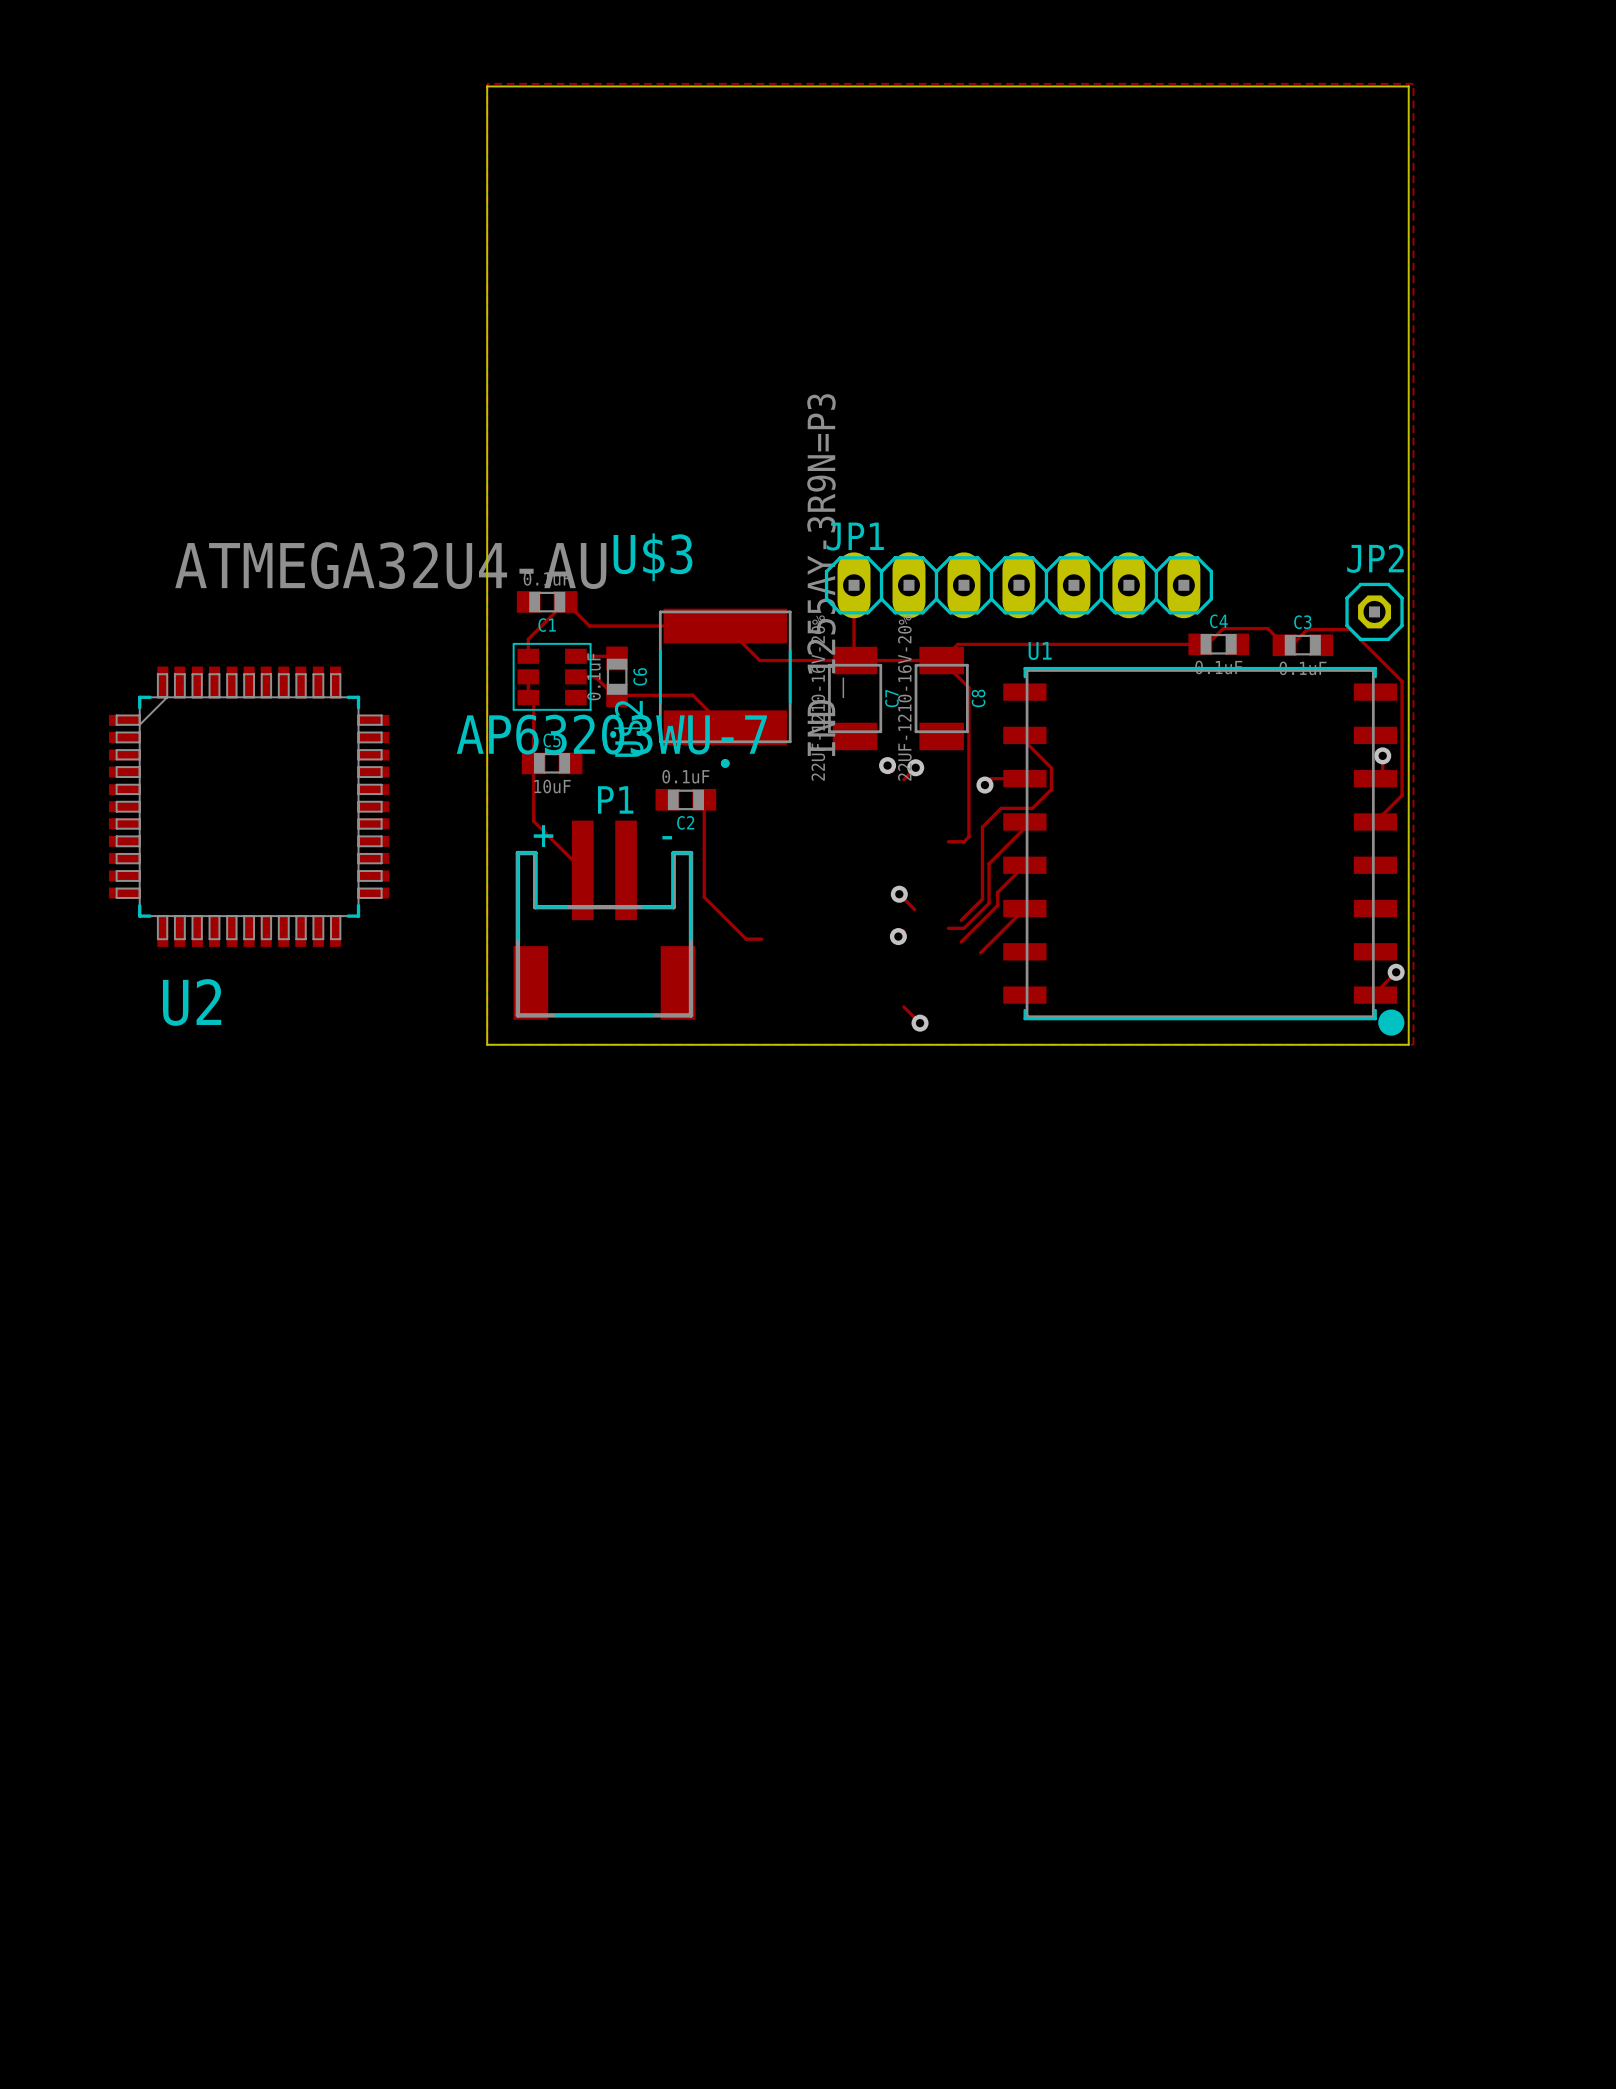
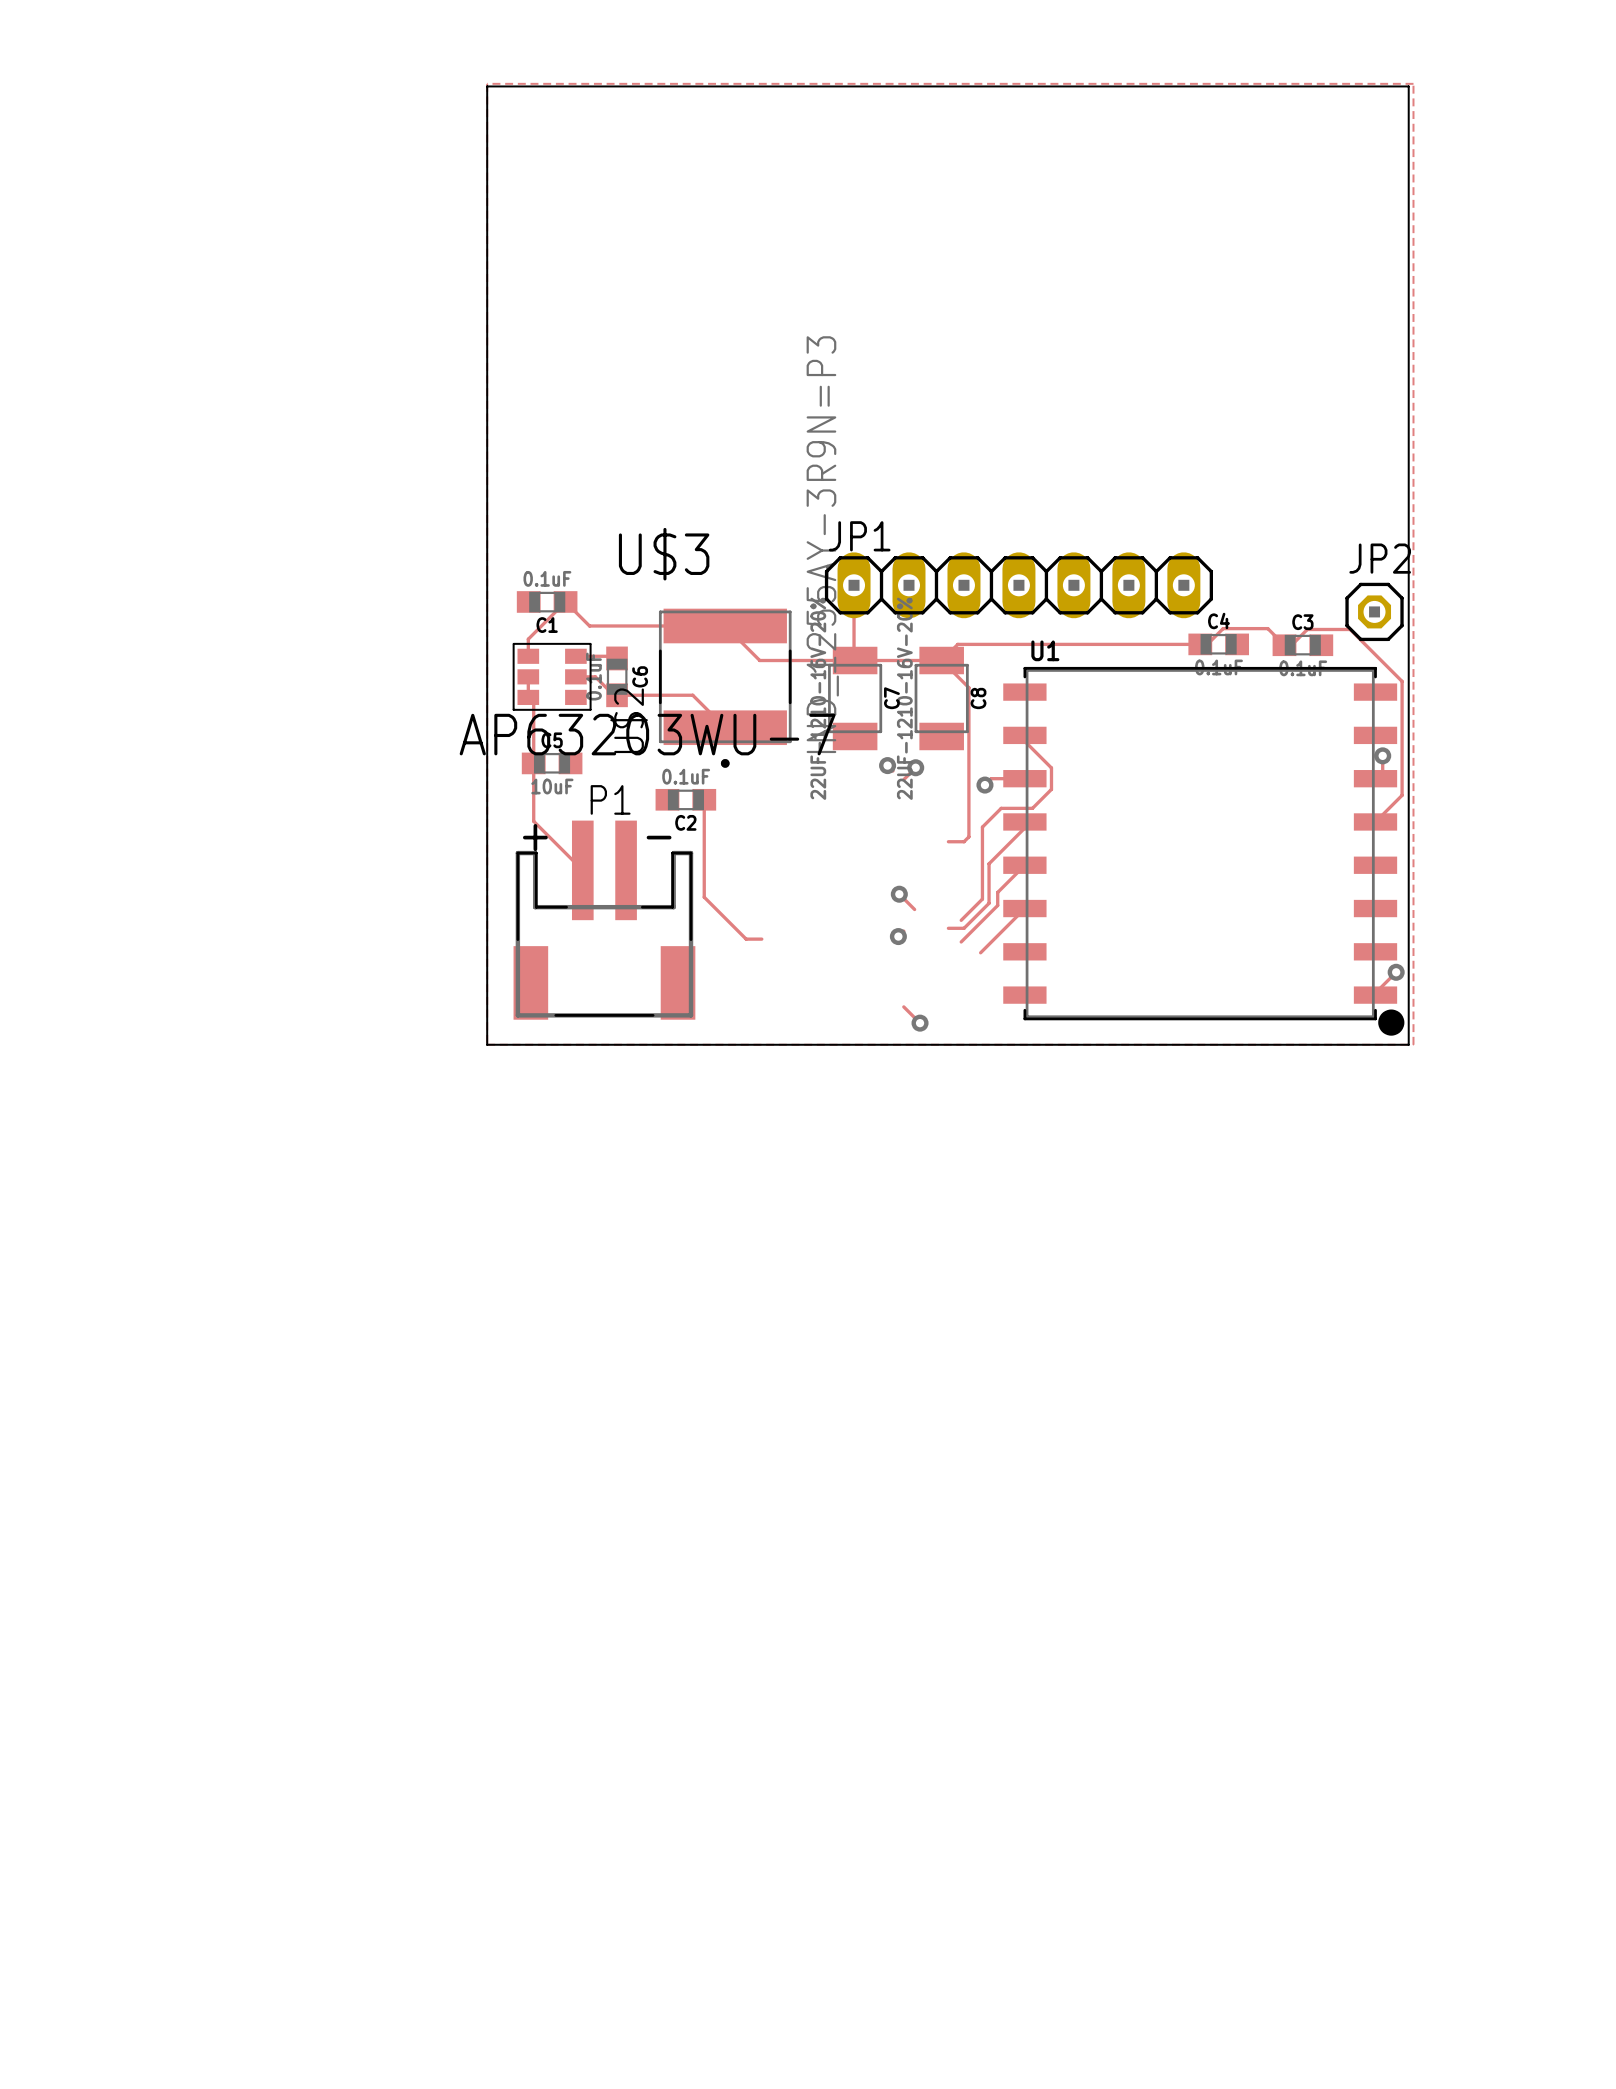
U2: ATMEGA32U4-AU (249, 806) -> none

